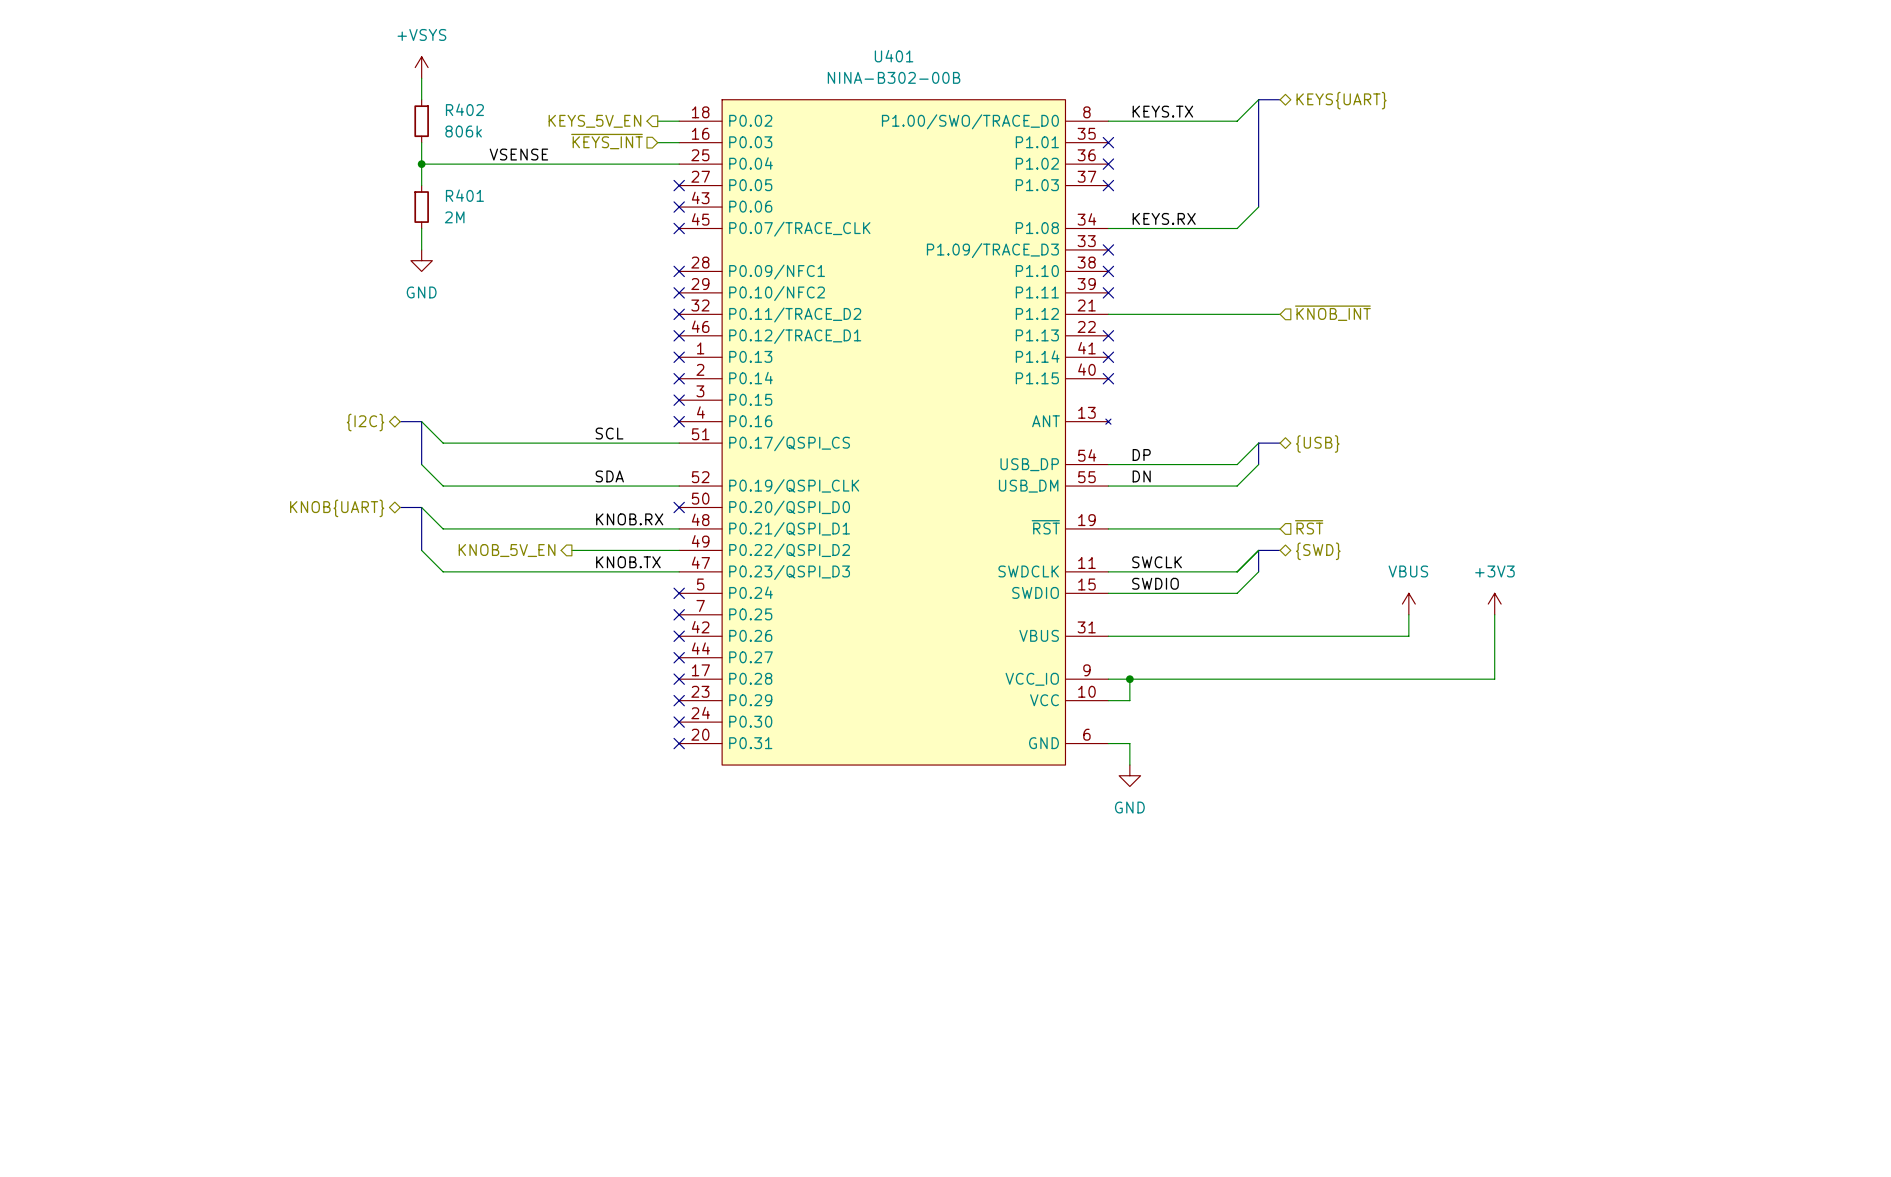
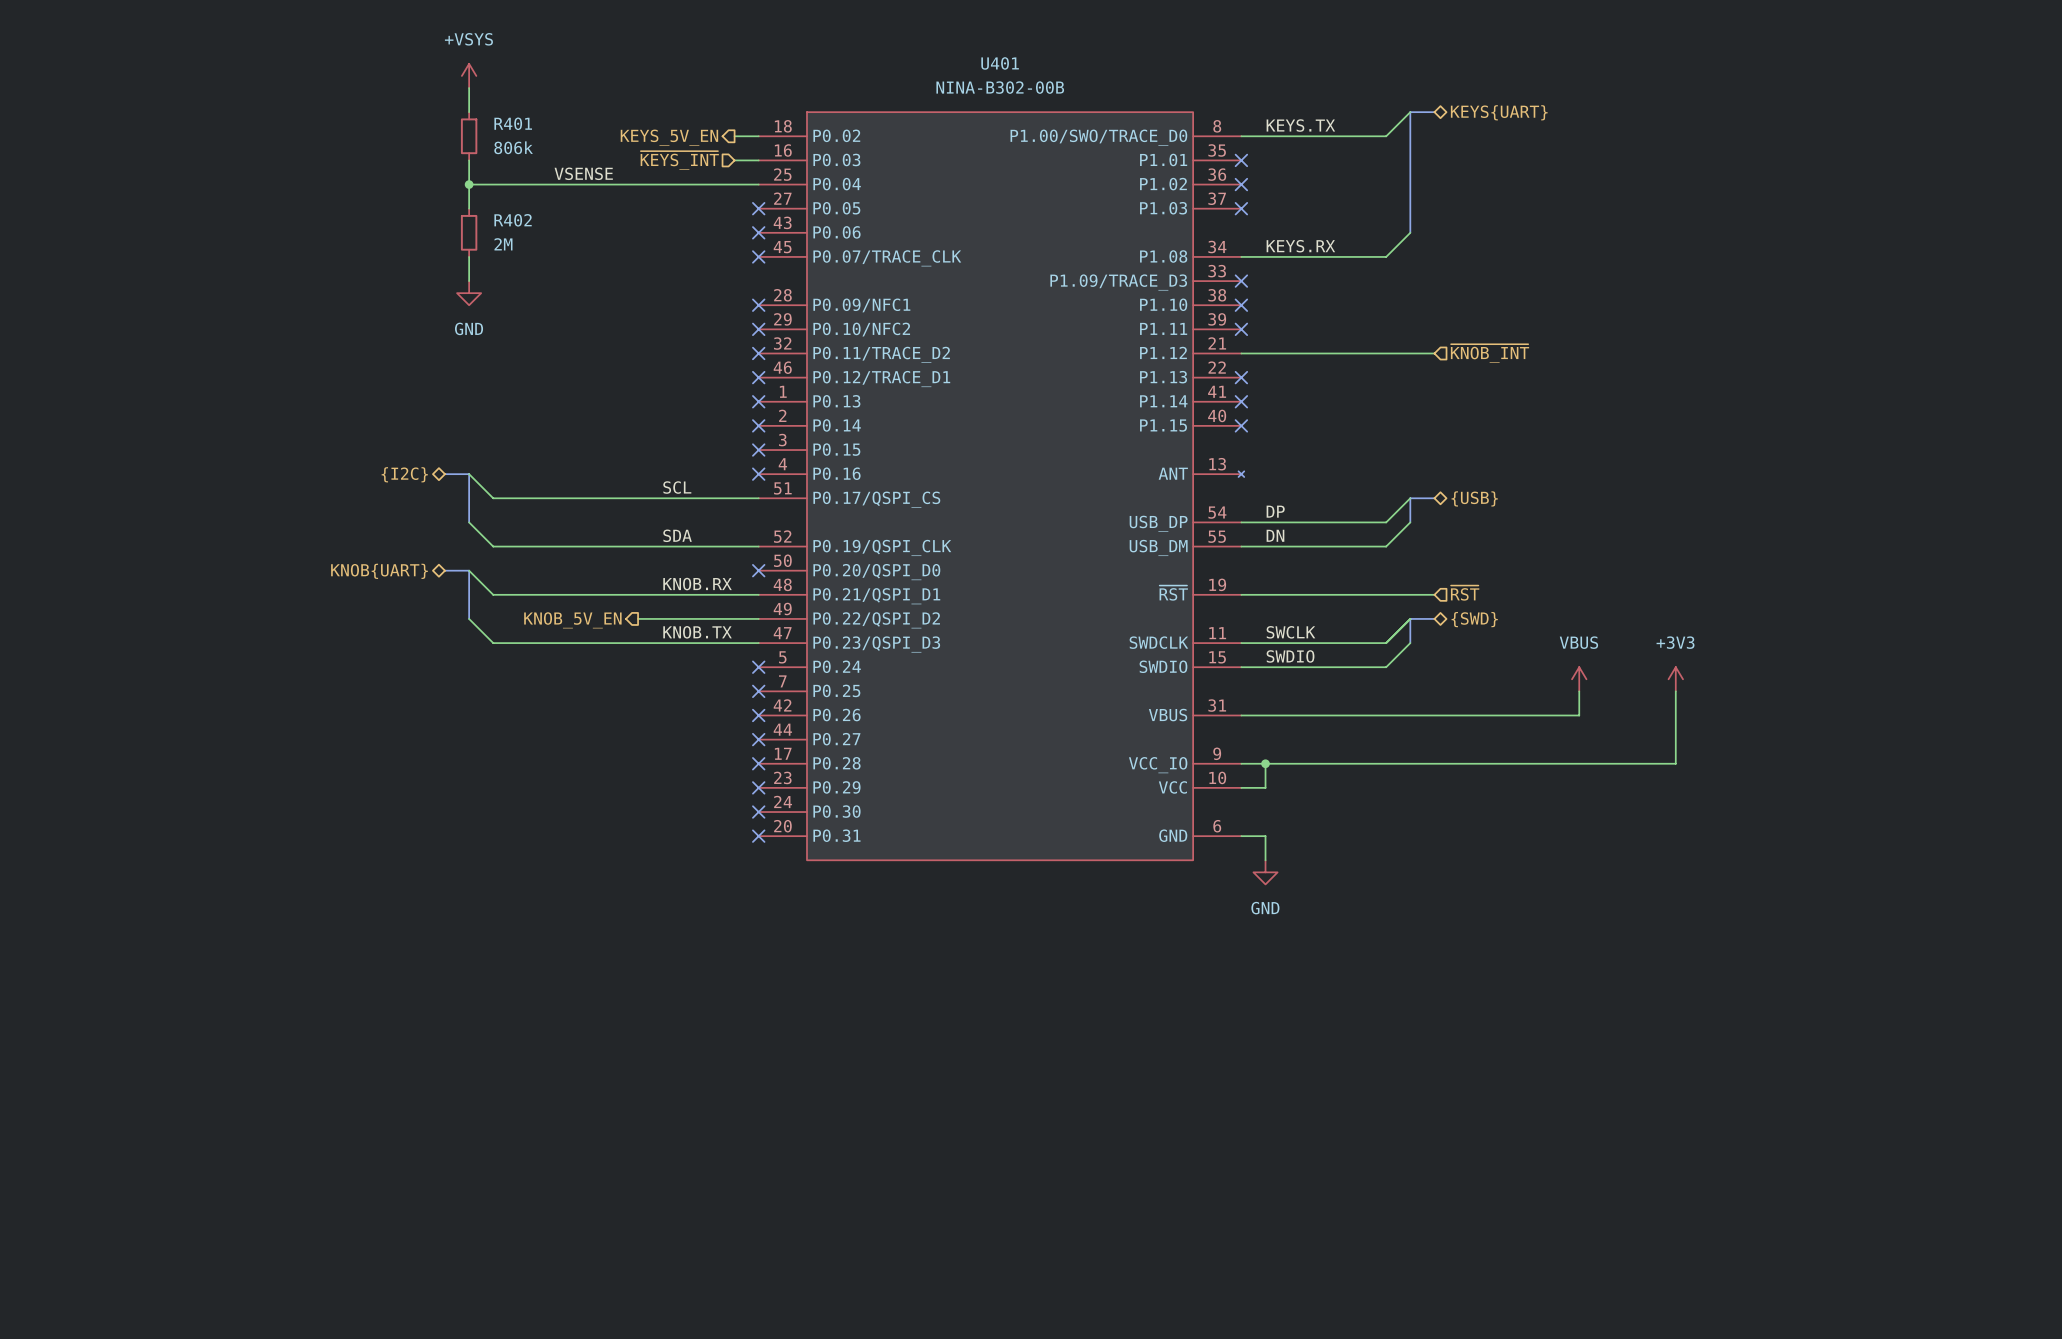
R402 name: R402 (464, 109) -> R401 (513, 123)
R401 name: R401 (464, 195) -> R402 (513, 220)

